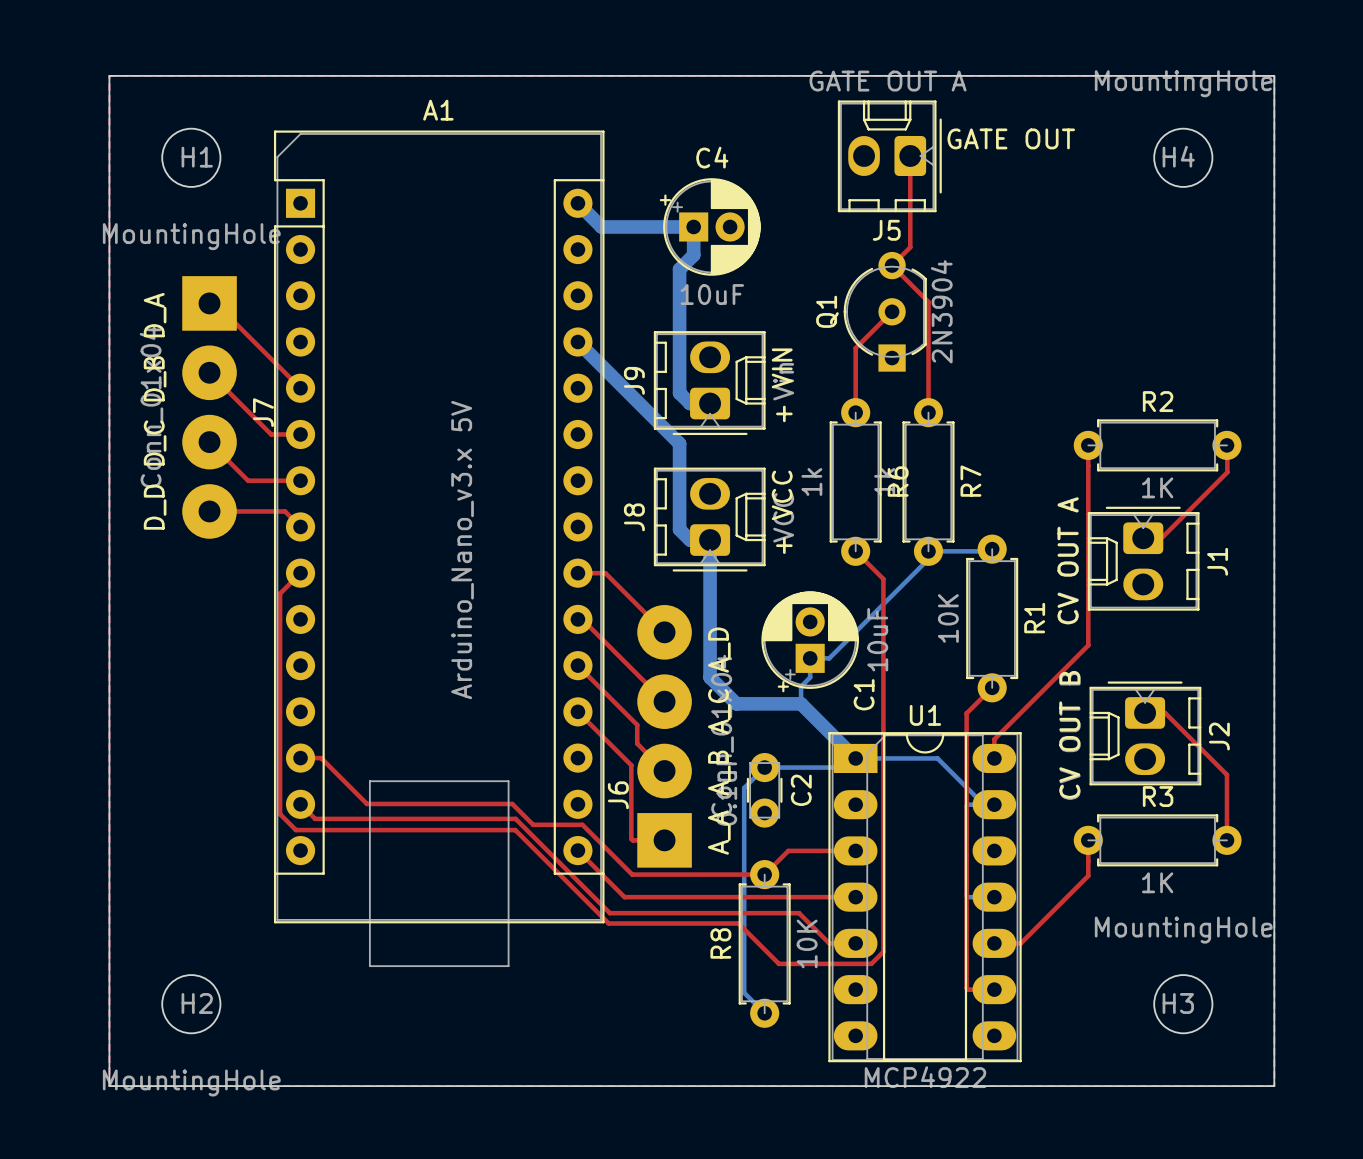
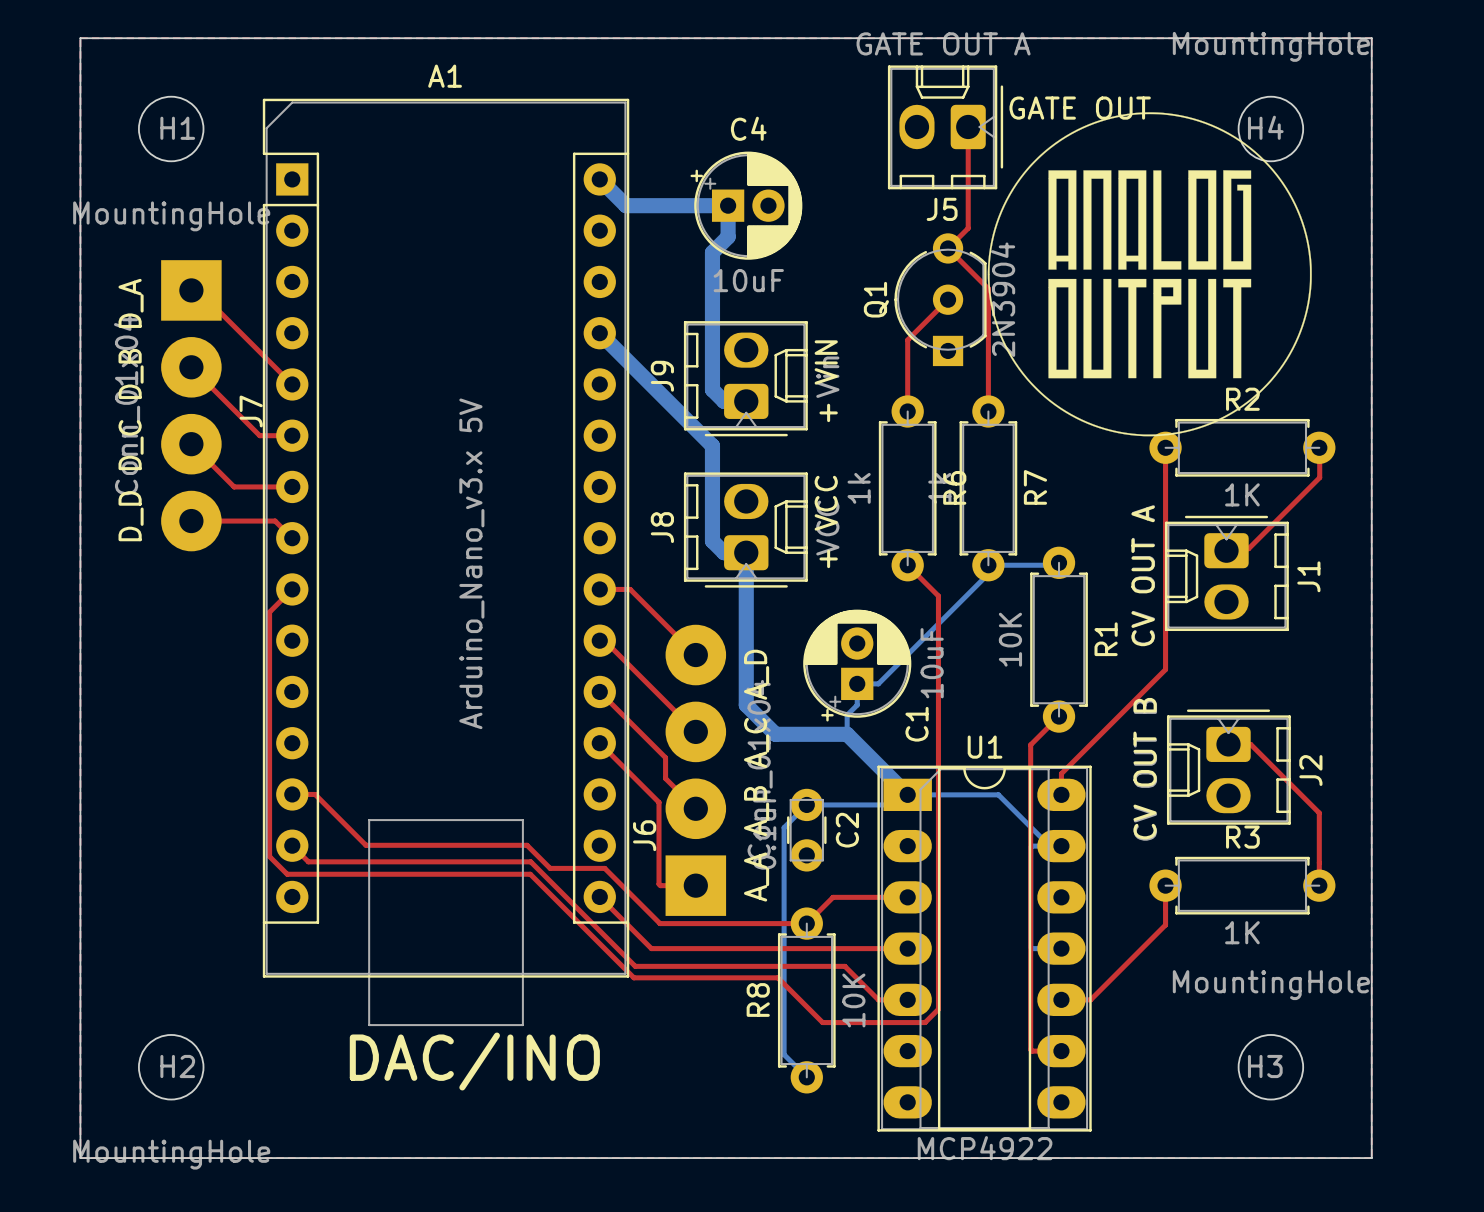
drawing: none -> [987, 112, 1312, 437]
text: none -> DAC/INO (474, 1061)

